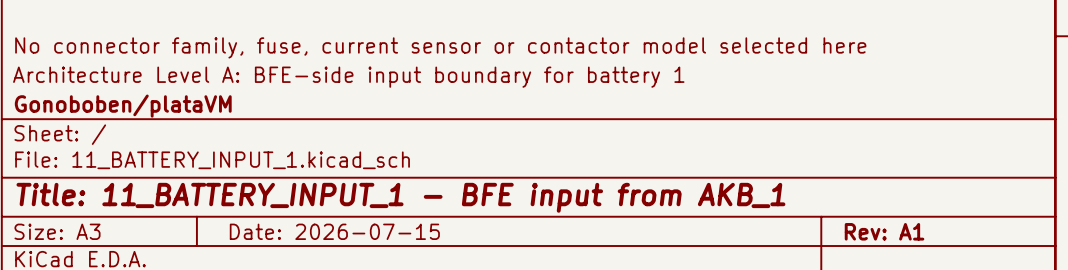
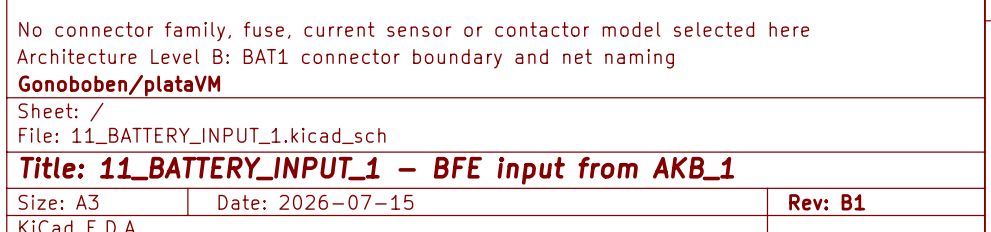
title block: Architecture Level A: BFE-side input boundary for battery 1 (348, 77) -> Architecture Level B: BAT1 connector boundary and net naming (345, 58)
title block: Rev: A1 (884, 231) -> Rev: B1 (827, 202)

